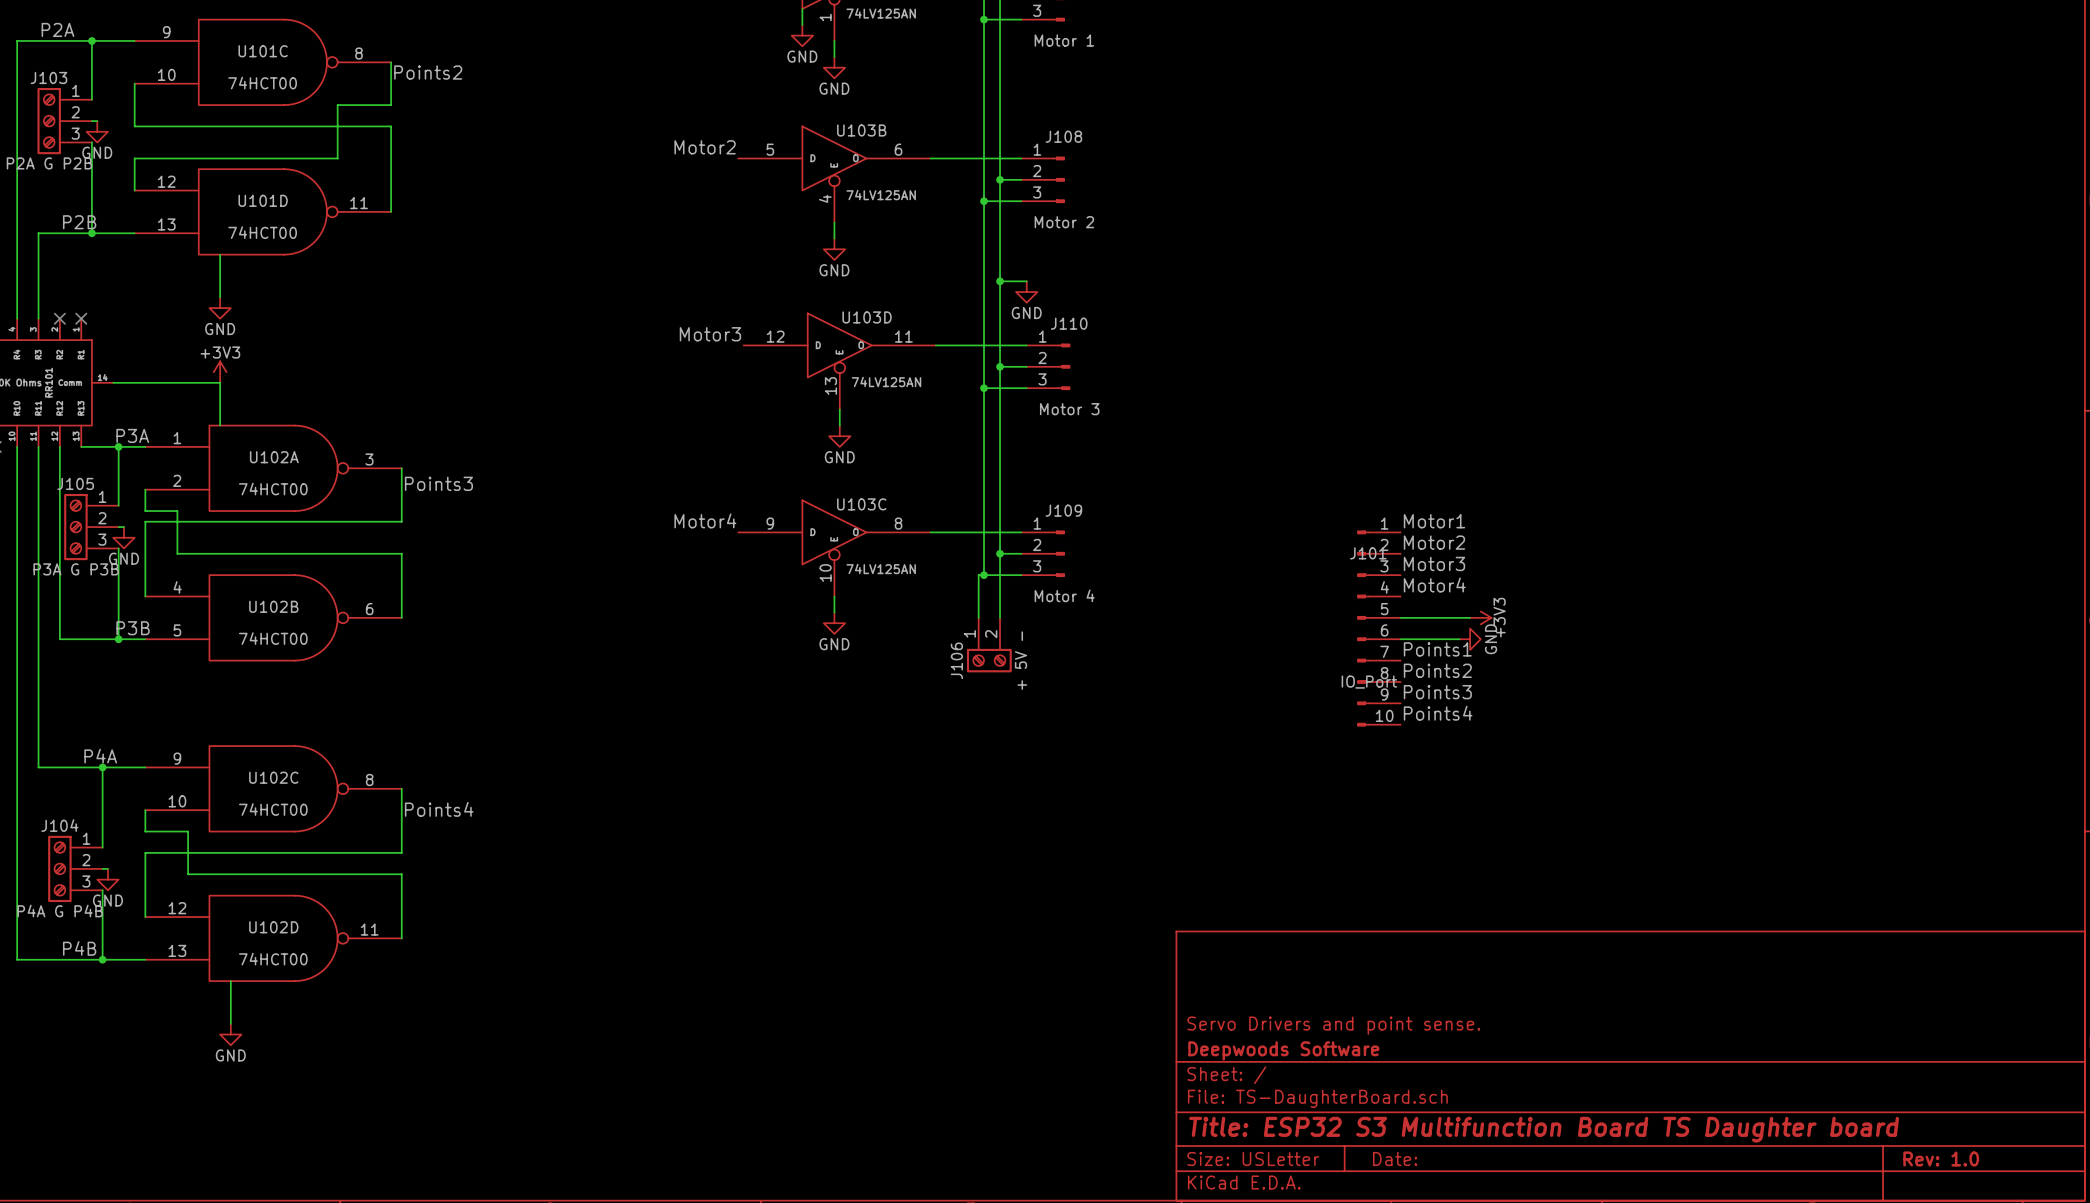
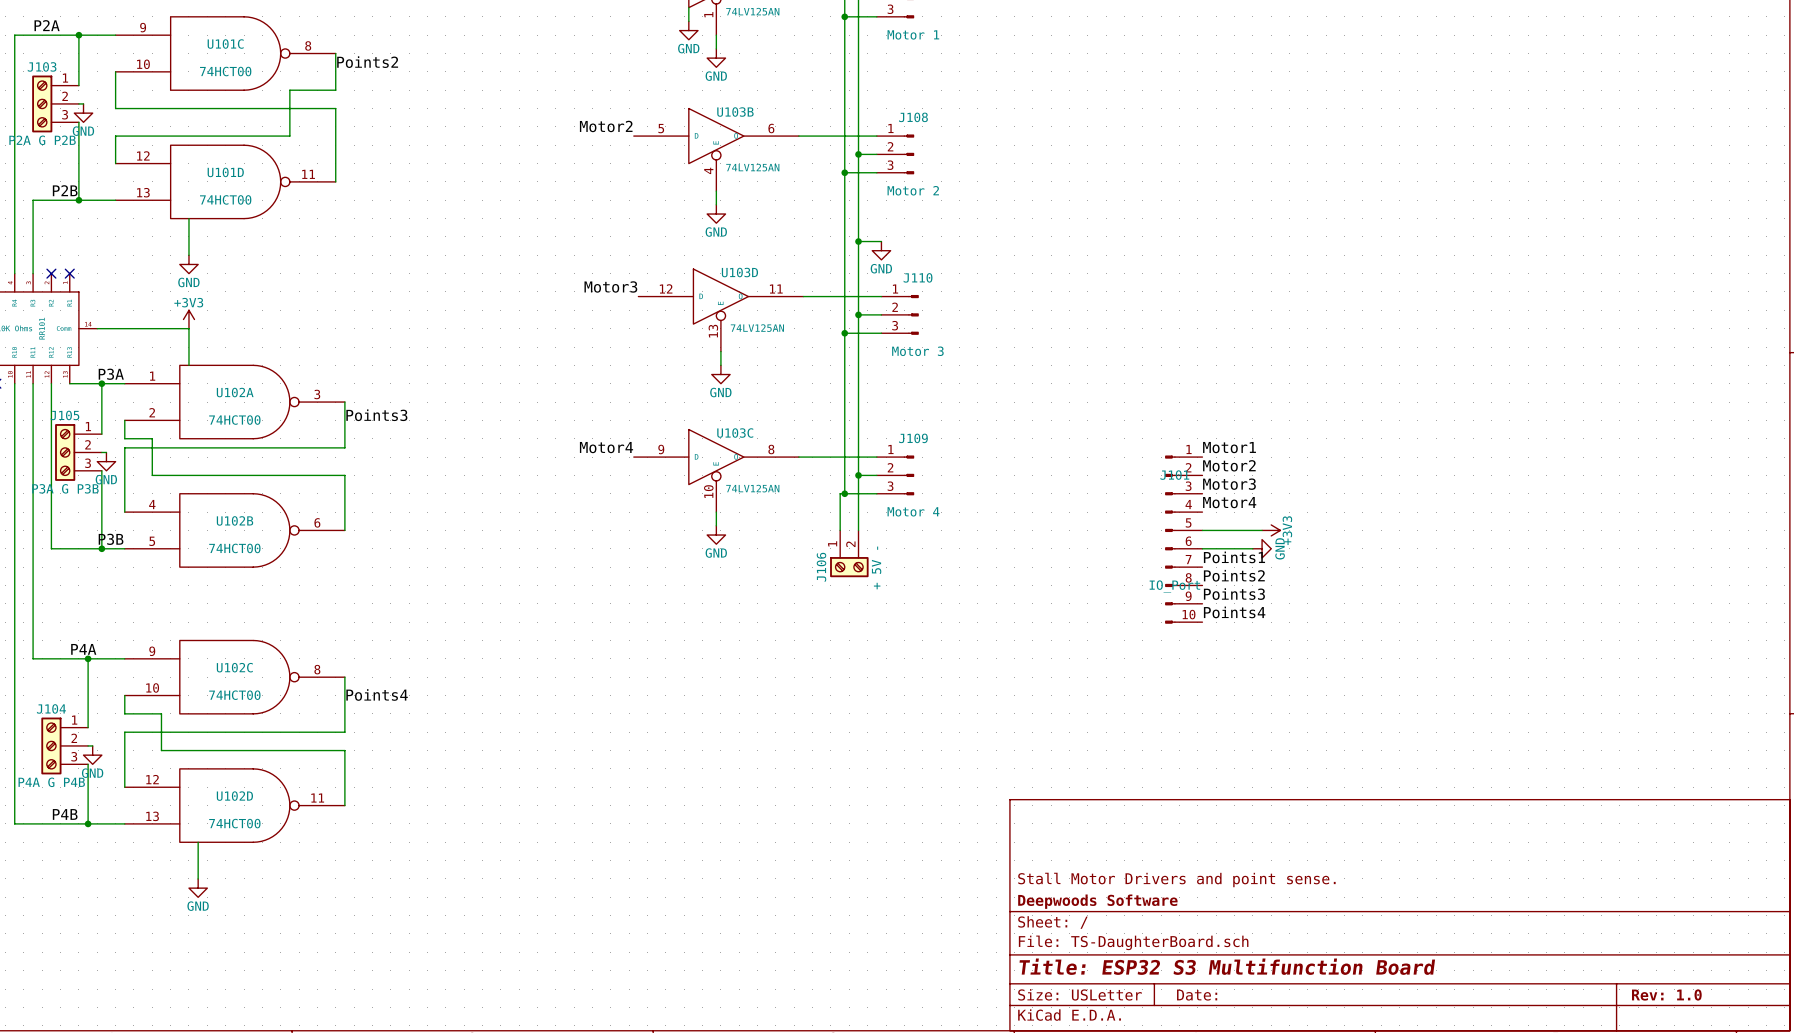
title block: Servo Drivers and point sense. (1333, 1025) -> Stall Motor Drivers and point sense. (1176, 879)
title block: Title: ESP32 S3 Multifunction Board TS Daughter board (1544, 1129) -> Title: ESP32 S3 Multifunction Board (1227, 966)

